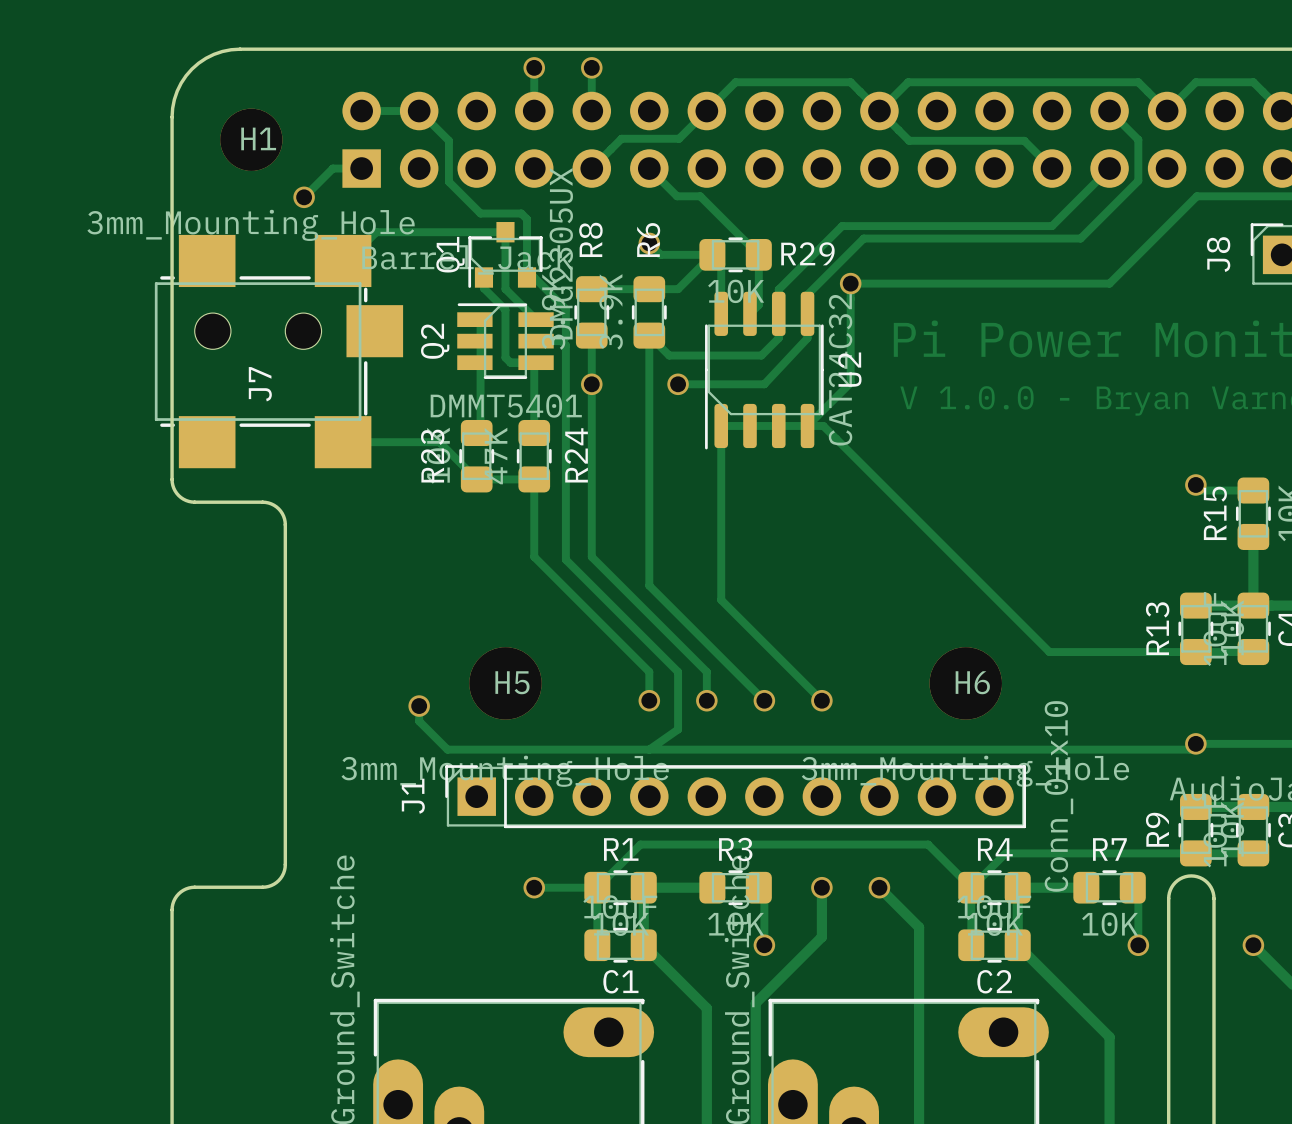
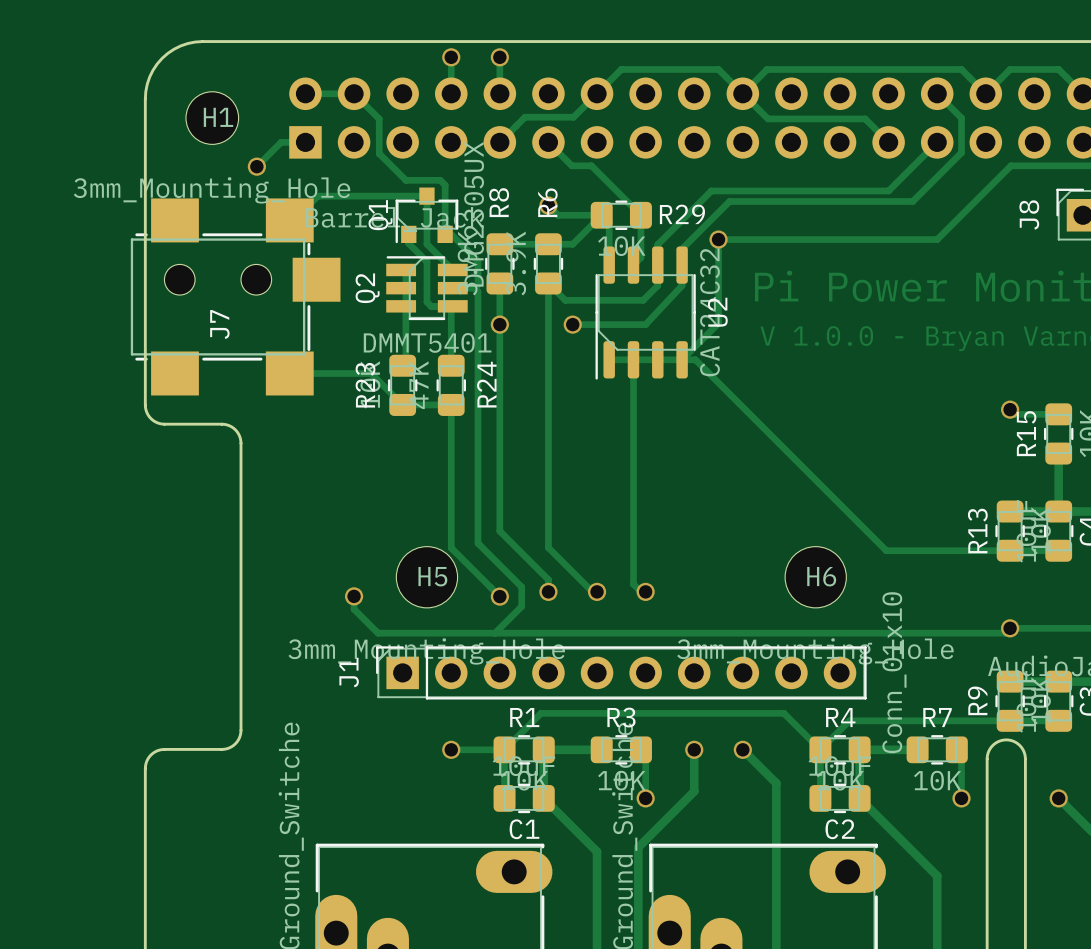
H1 footprint: [220, 108, 283, 171] -> [185, 91, 239, 145]
track: (721, 425) (721, 600) (821, 700) -> none
track: none -> (633, 359) (633, 584) (645, 596)
track: (534, 556) (649, 671) (649, 686) -> (499, 470) (499, 531) (548, 579)
track: none -> (451, 470) (451, 547) (499, 596)
track: (591, 556) (706, 671) (706, 700) -> none
track: (565, 559) (678, 671) (678, 729) (649, 749) -> (477, 472) (477, 543) (521, 587) (521, 606) (494, 633)
track: (649, 585) (764, 700) -> (548, 494) (548, 547) (597, 596)
H5 footprint: [469, 647, 542, 720] -> [396, 546, 458, 608]
H6 footprint: [929, 647, 1002, 720] -> [785, 546, 847, 608]
via: (821, 700) -> none
via: none -> (499, 596)

